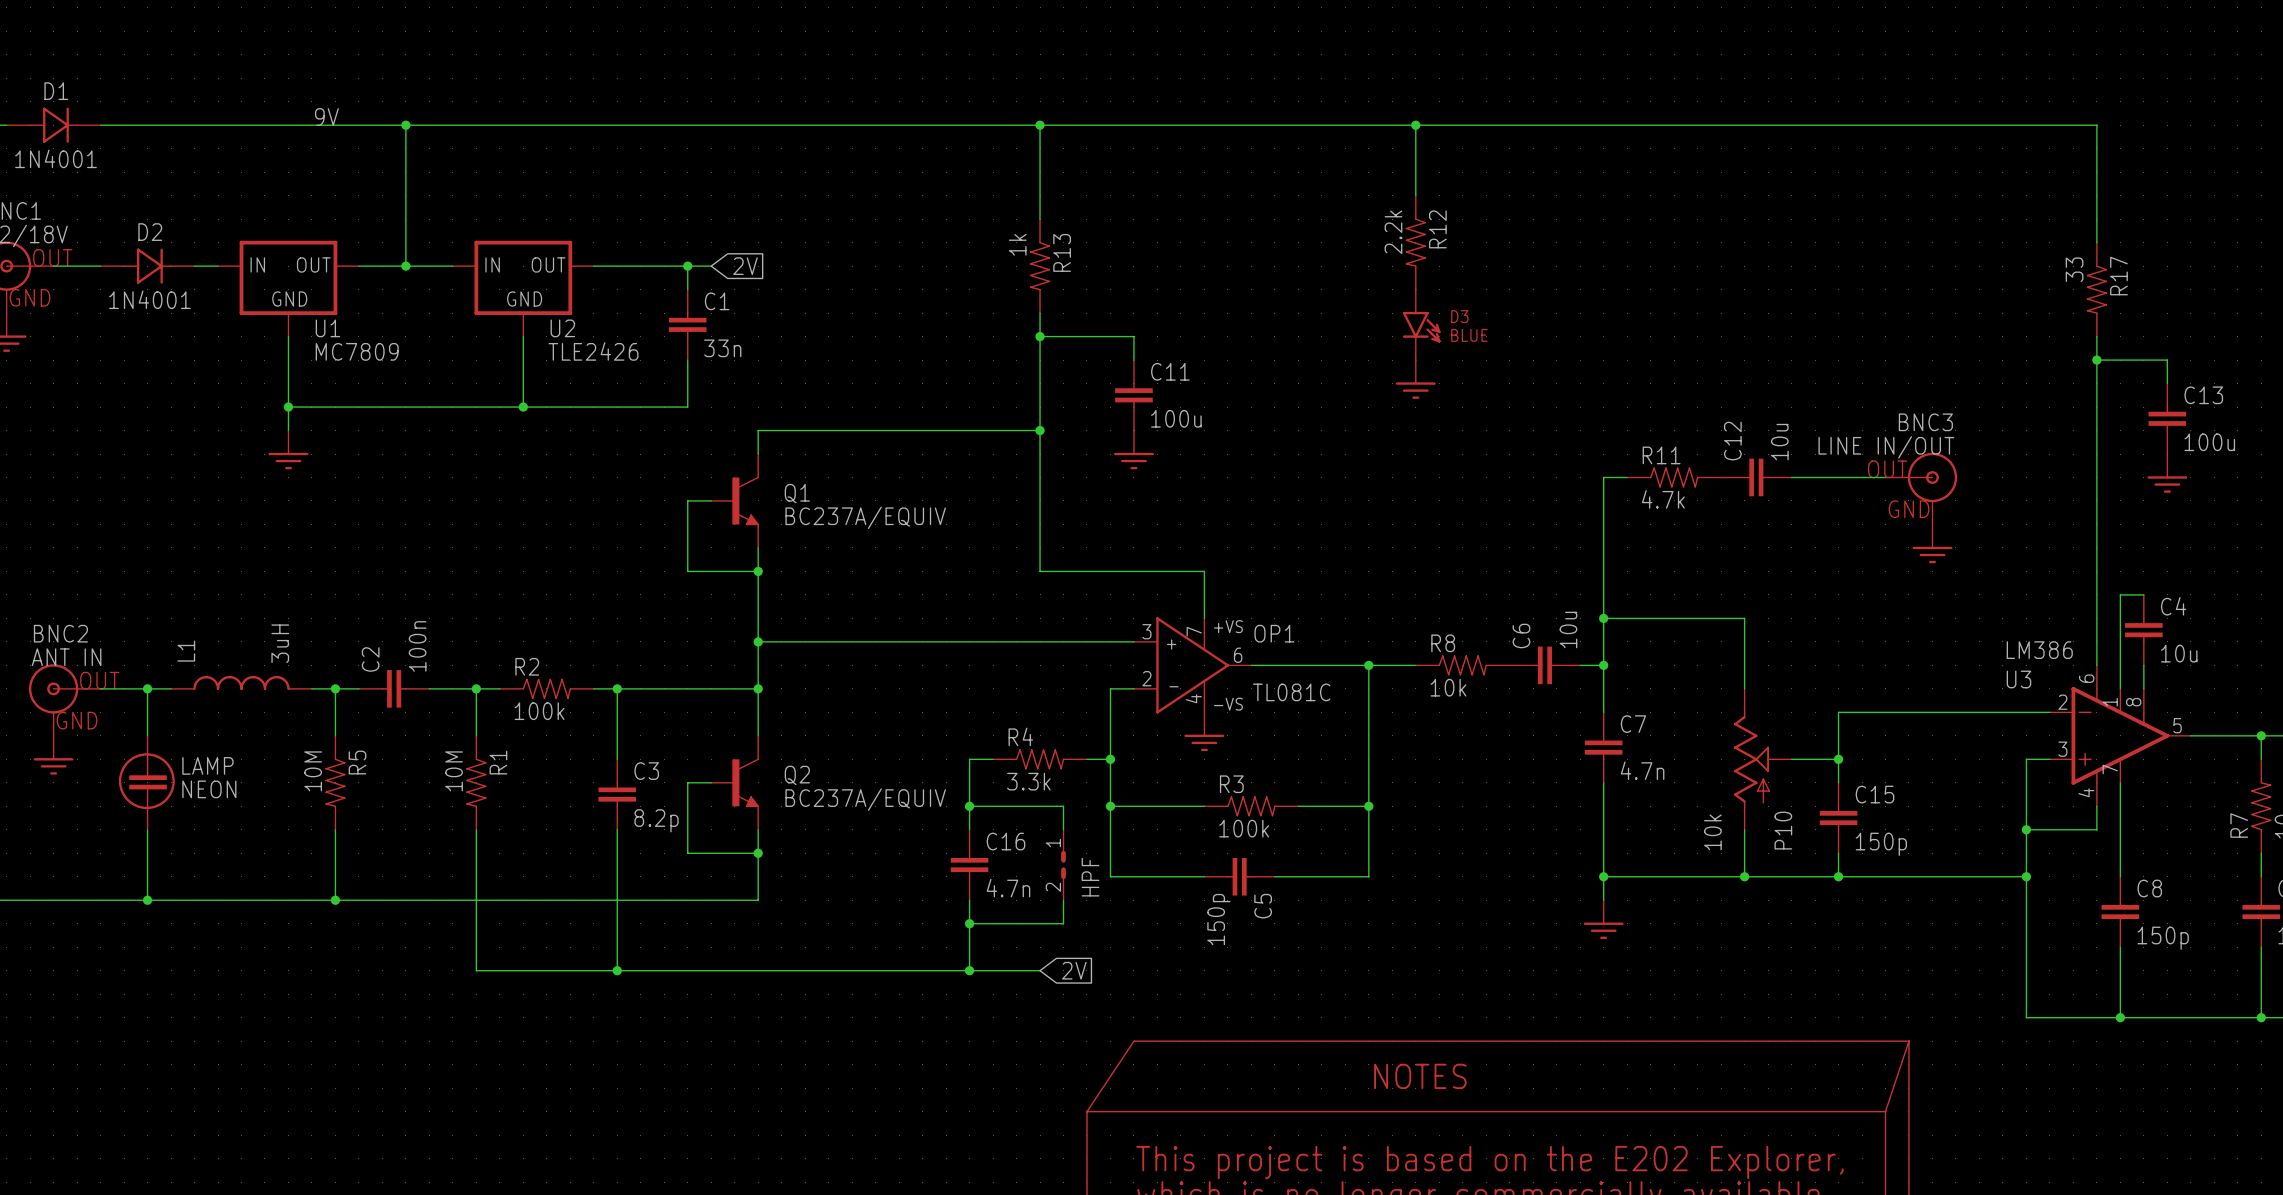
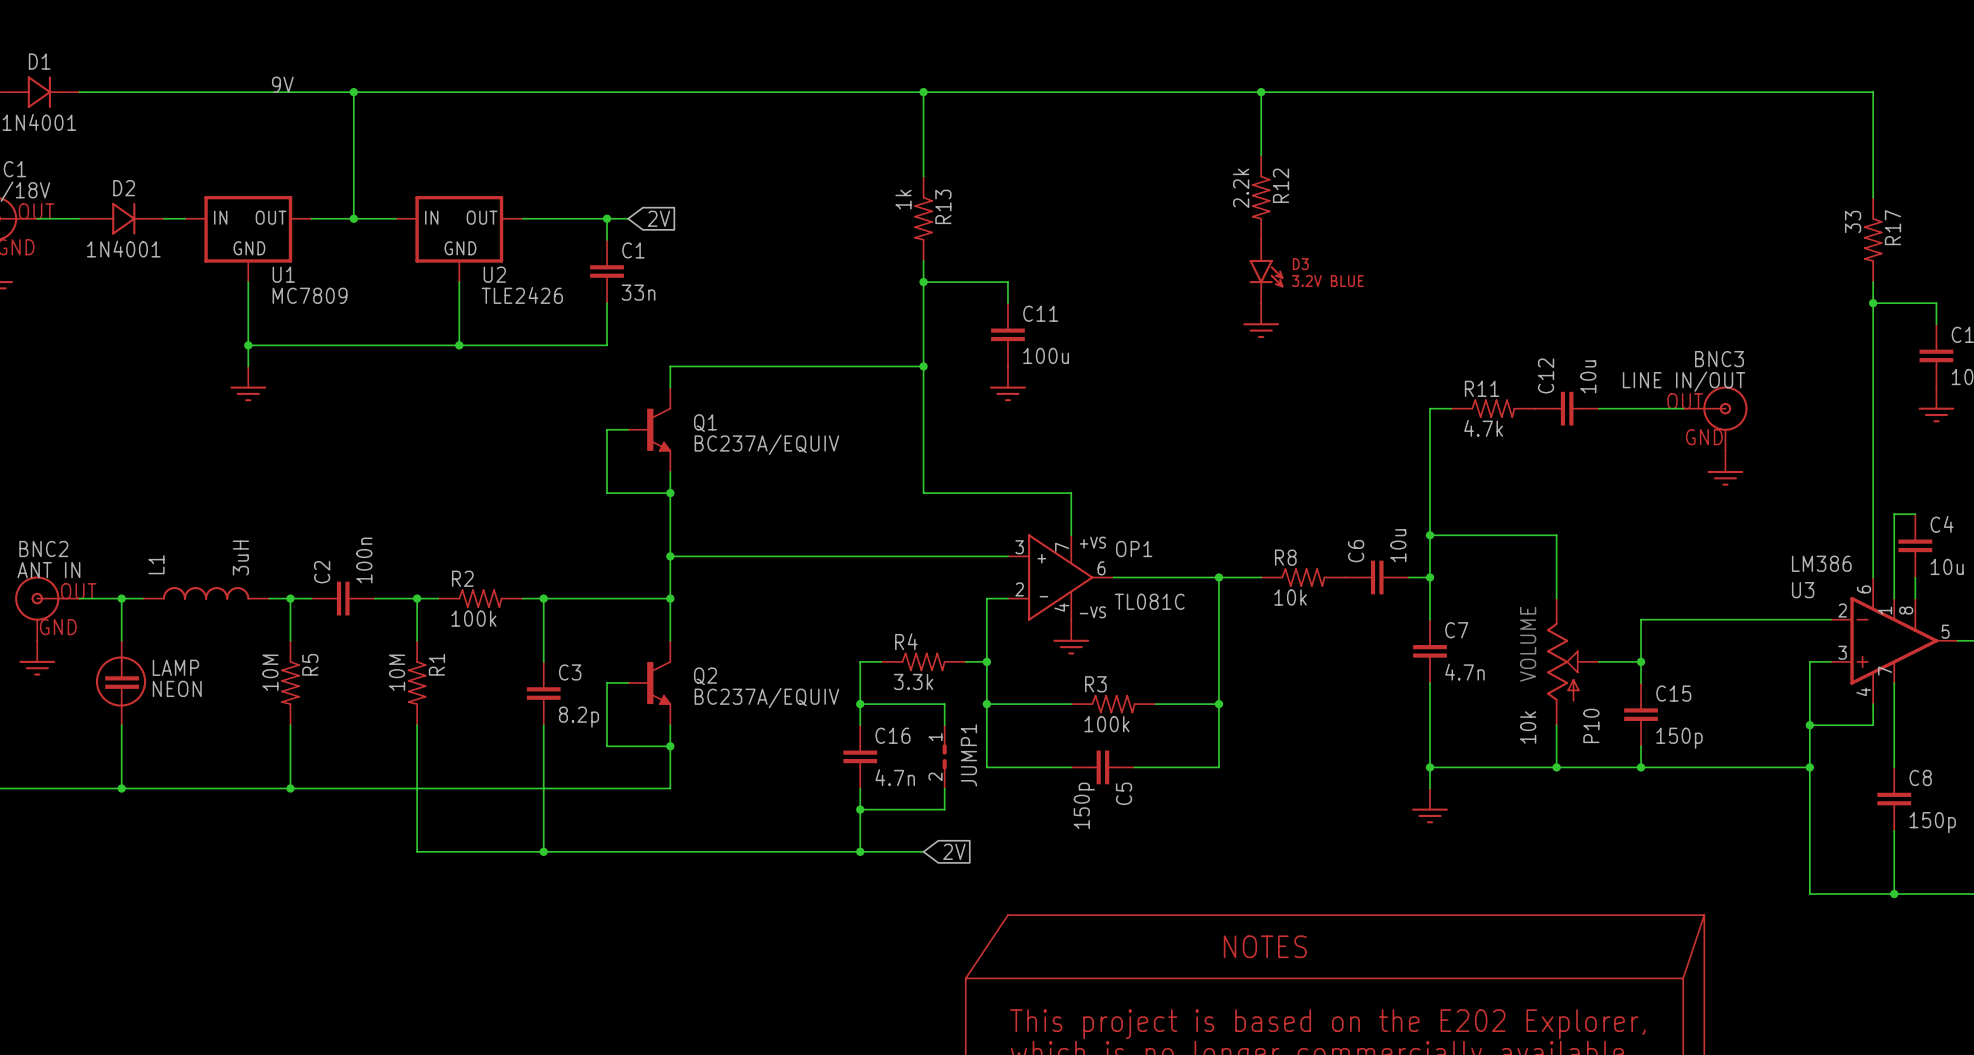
D3 value: BLUE (1469, 335) -> 3.2V BLUE (1327, 281)
text: none -> VOLUME (1528, 644)
HPF name: HPF (1090, 877) -> JUMP1 (968, 755)

